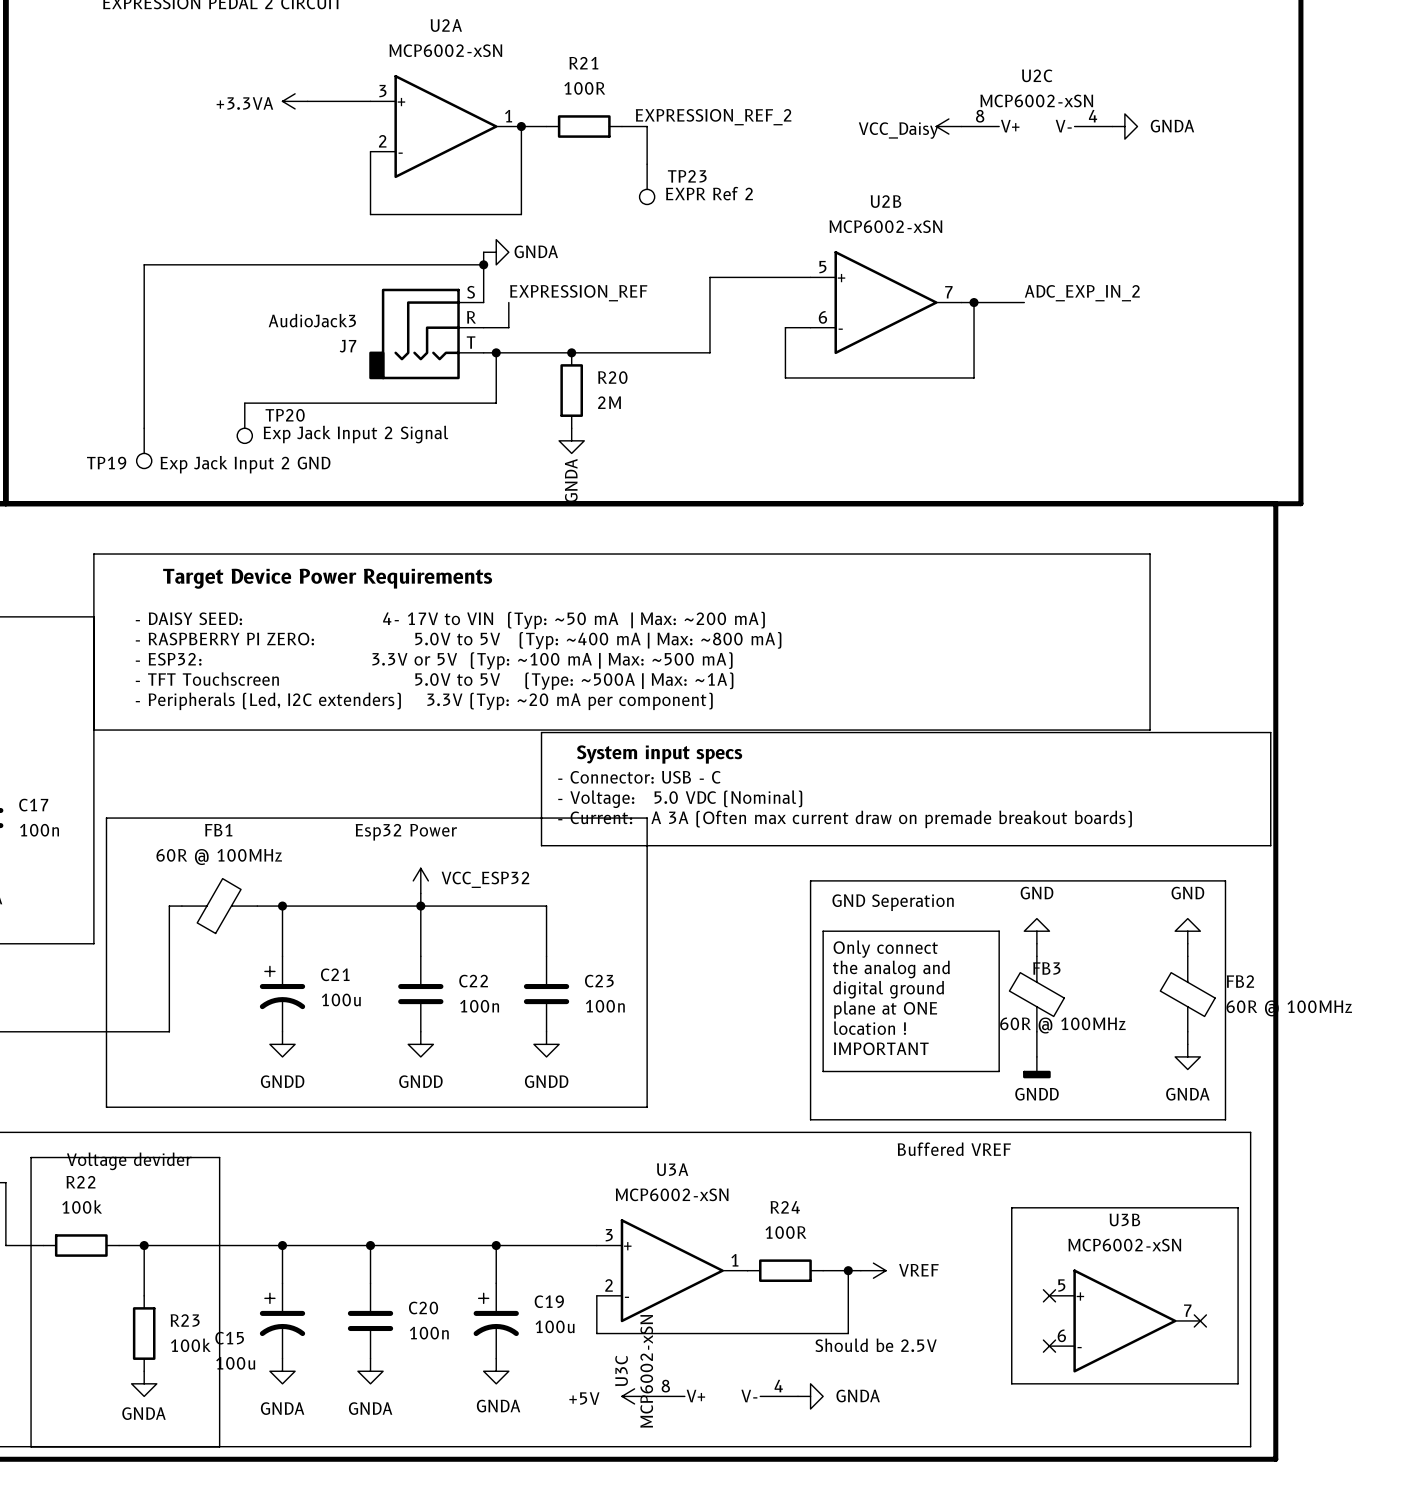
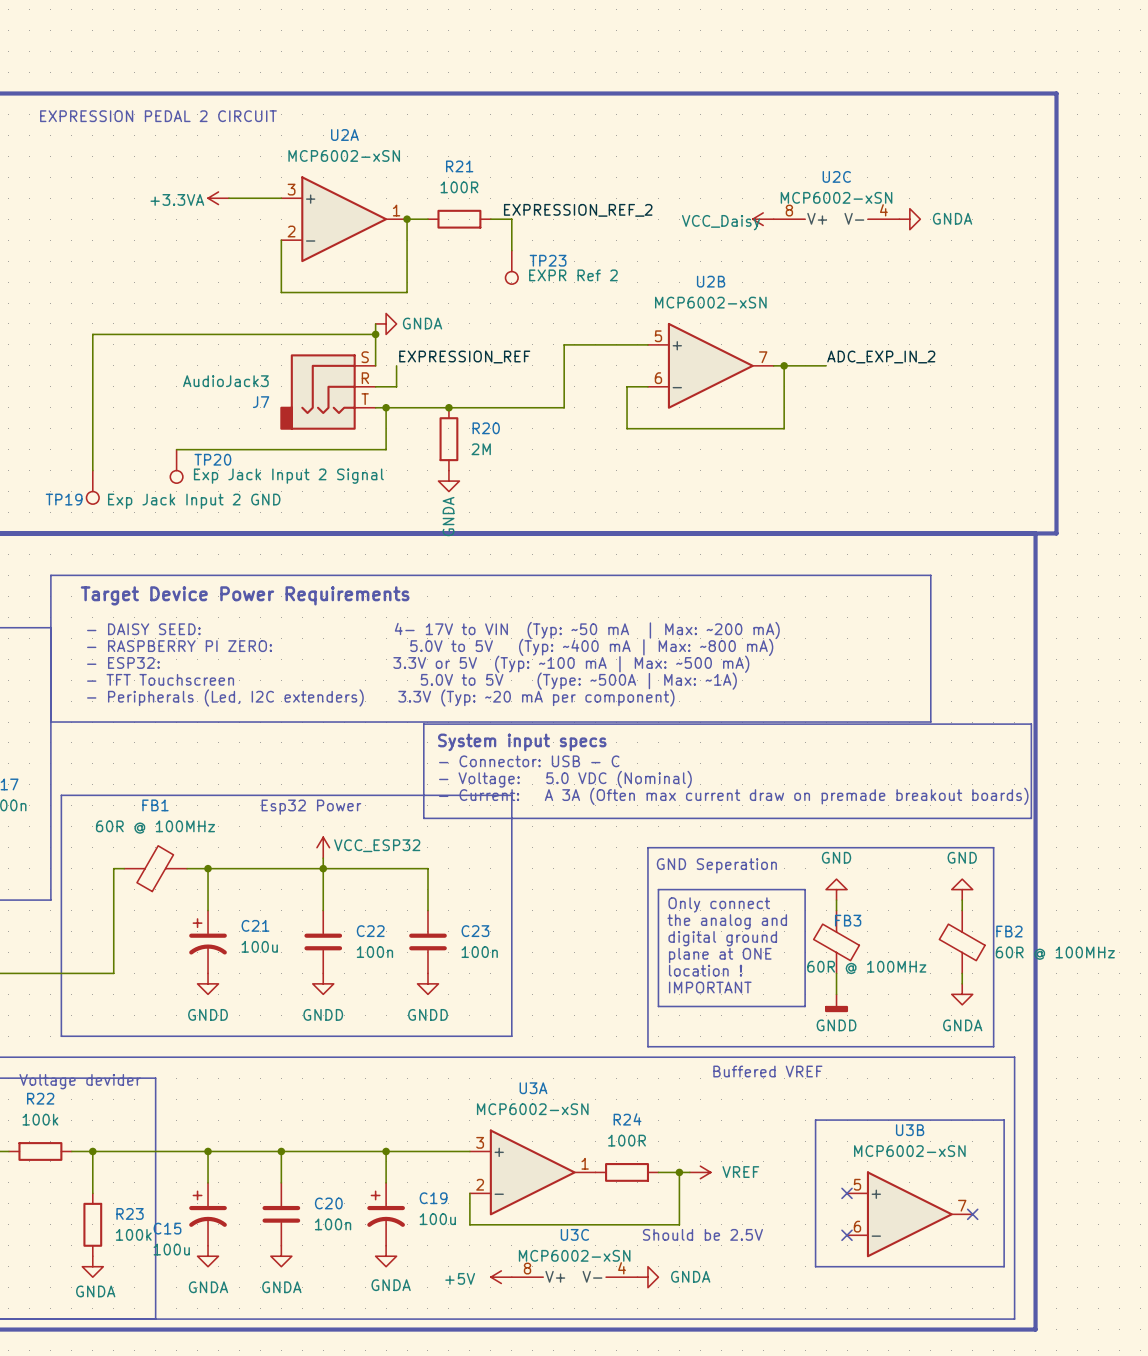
U3C name rotation: 0° (621, 1370) -> 90° clockwise (574, 1234)
U3C name position: U3C (621, 1370) -> U3C (574, 1234)
U3C value rotation: 0° (646, 1371) -> 90° clockwise (574, 1255)

